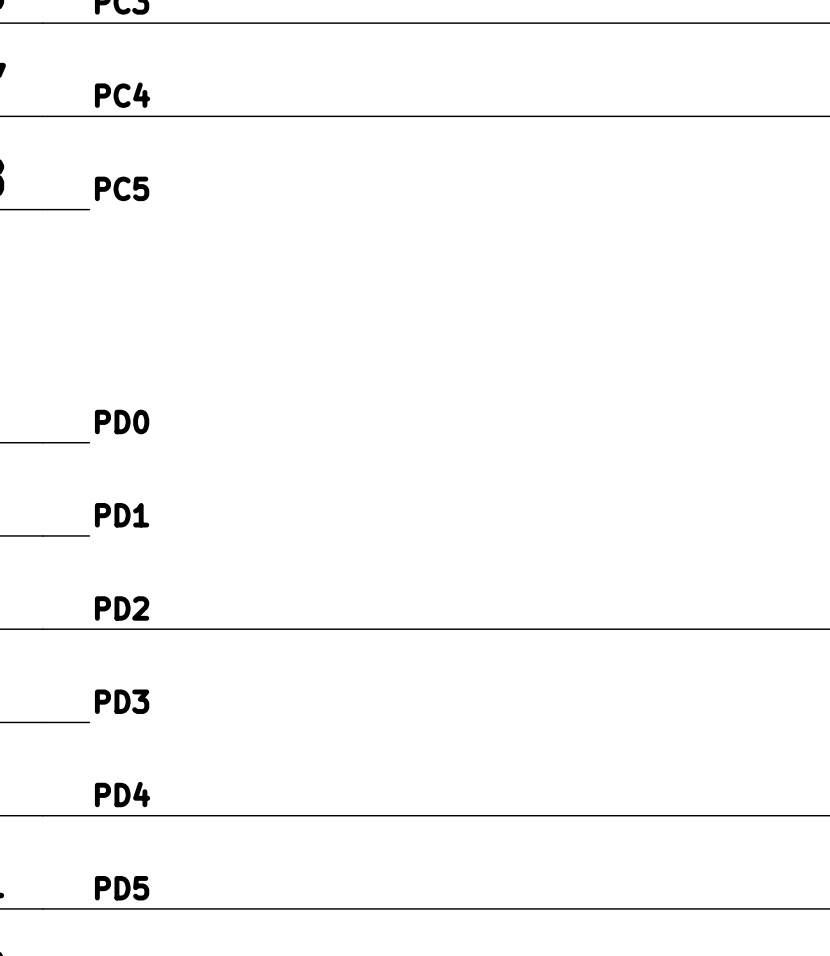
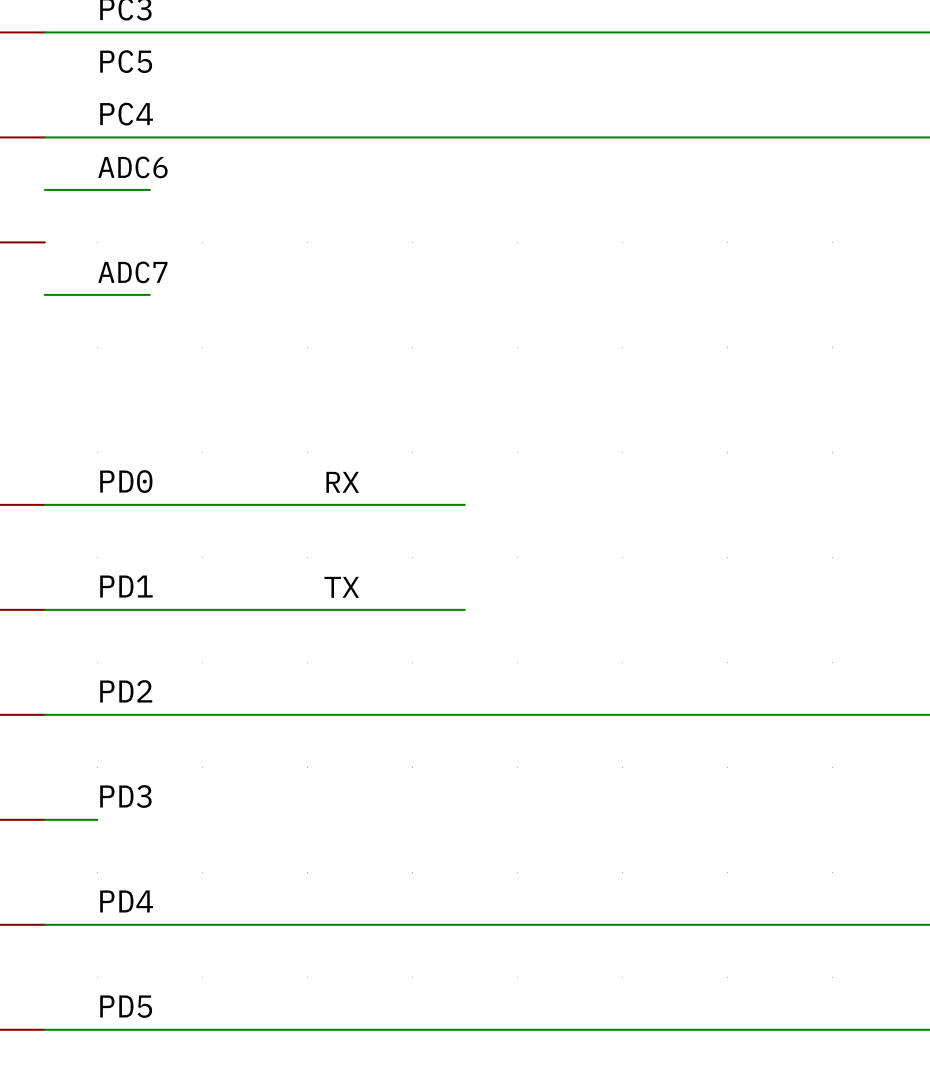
label: none -> ADC6 (132, 167)
wire: none -> (44, 189) (149, 189)
label position: PC5 (122, 188) -> PC5 (126, 61)
wire: (42, 209) (89, 209) -> none
label: none -> ADC7 (132, 272)
wire: none -> (44, 294) (149, 294)
label: none -> RX (342, 482)
wire: none -> (97, 504) (464, 504)
label: none -> TX (341, 587)
wire: none -> (97, 609) (464, 609)

